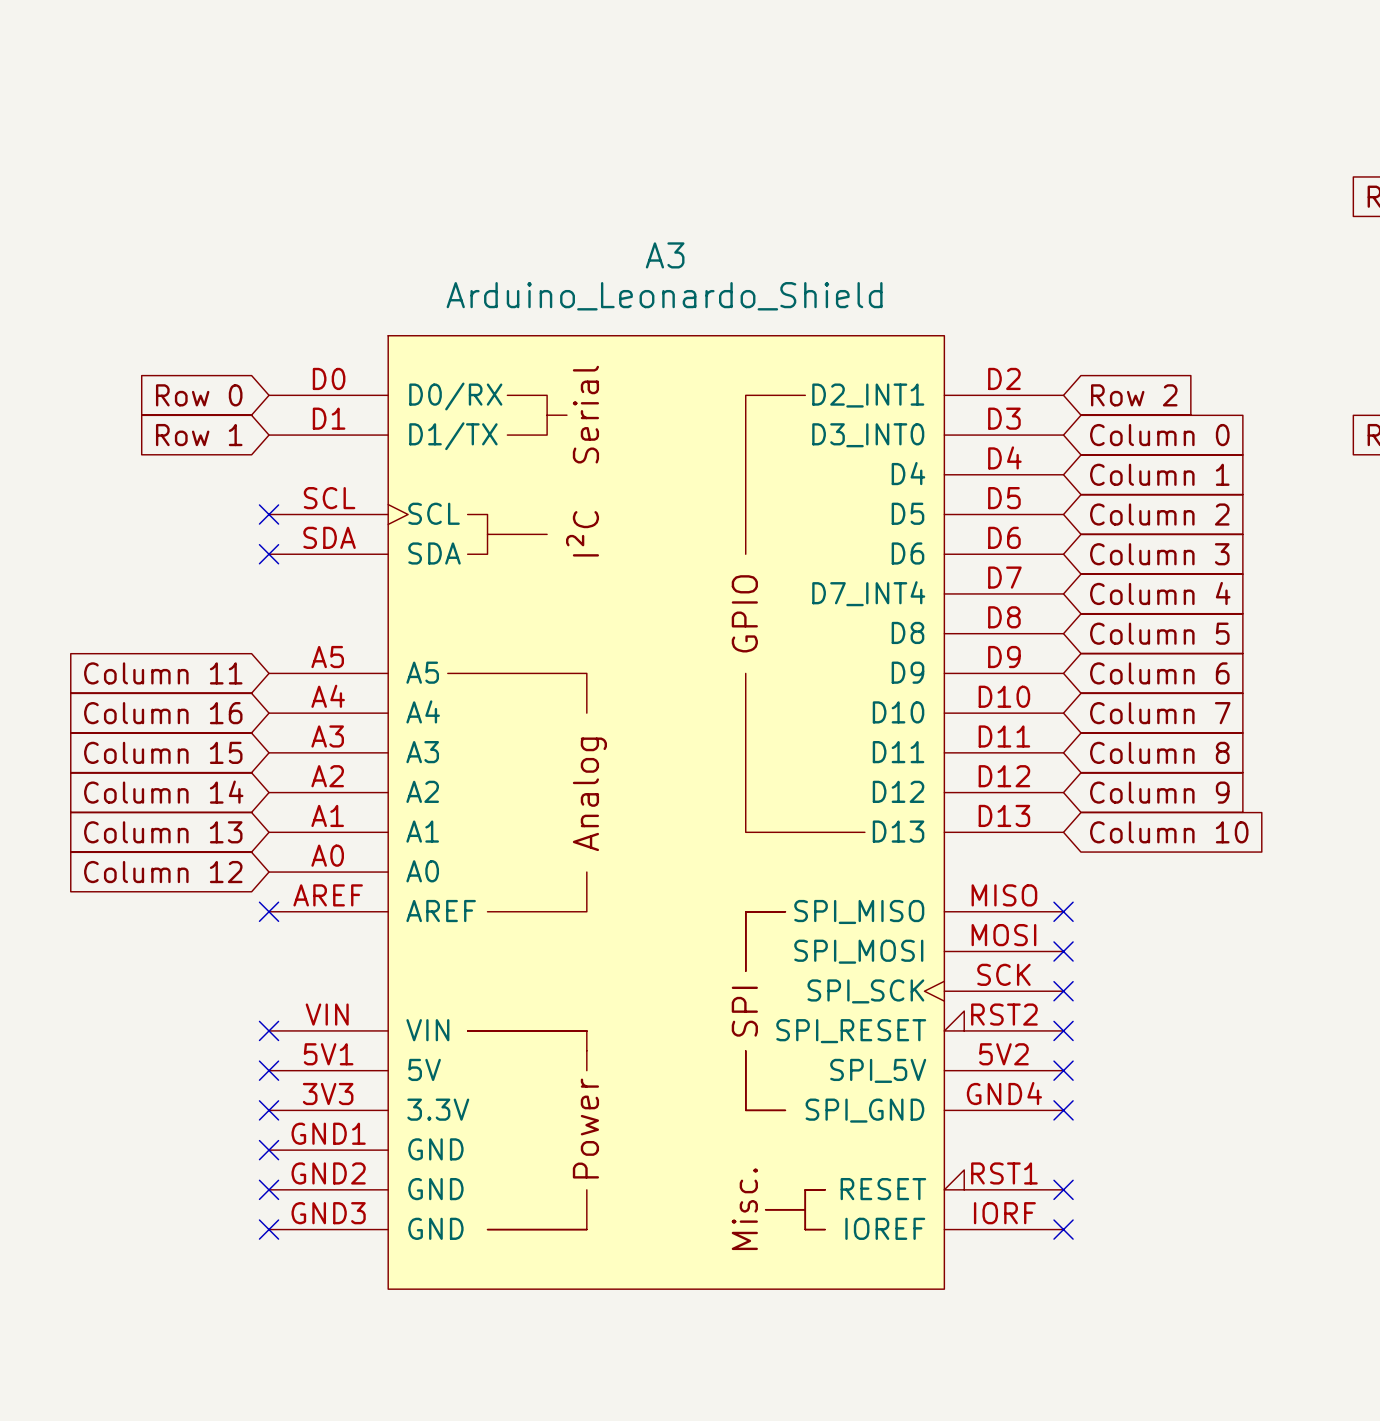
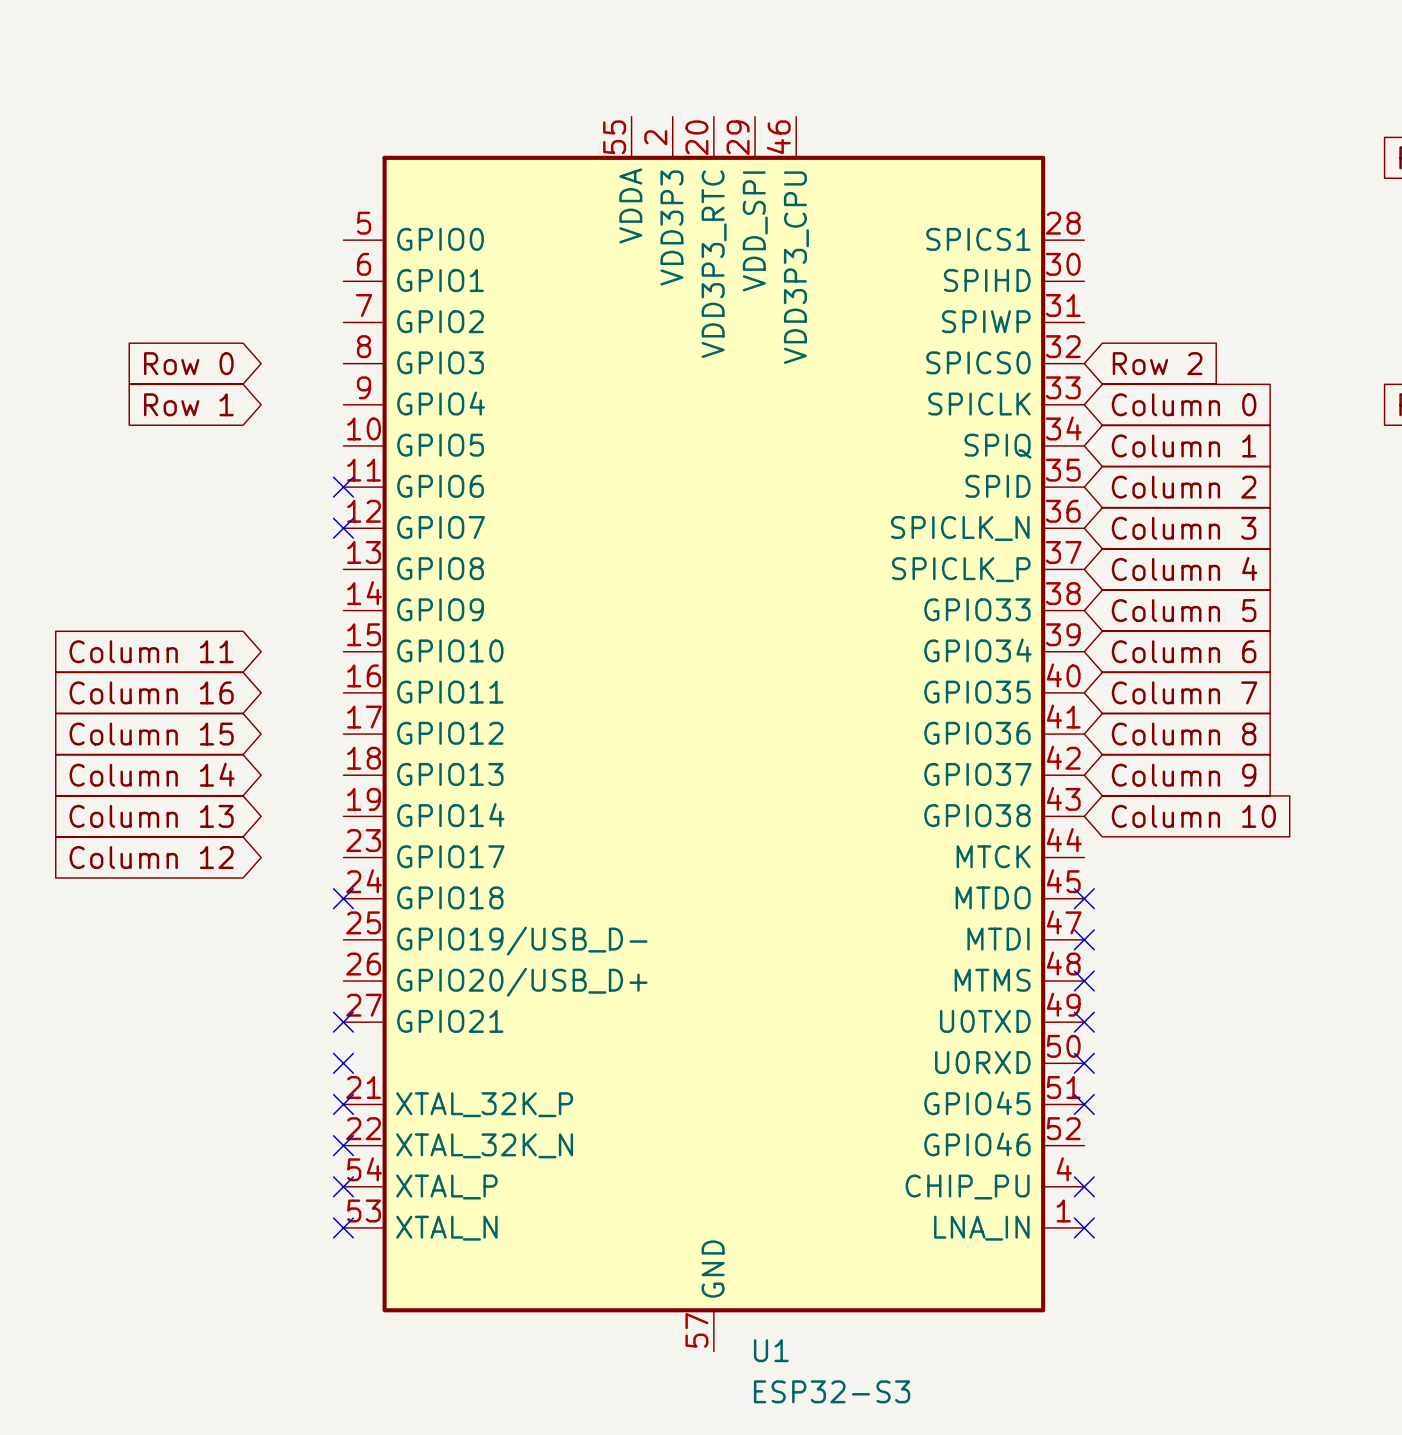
no-connect mark: (269, 514) -> none
no-connect mark: none -> (343, 487)
no-connect mark: (269, 554) -> none
no-connect mark: none -> (343, 528)
U1: none -> ESP32-S3 (713, 734)
A3: Arduino_Leonardo_Shield (666, 812) -> none
no-connect mark: (269, 911) -> none
no-connect mark: none -> (343, 898)
no-connect mark: (269, 1030) -> none
no-connect mark: none -> (343, 1022)
no-connect mark: (269, 1070) -> none
no-connect mark: none -> (343, 1063)
no-connect mark: (269, 1110) -> none
no-connect mark: none -> (343, 1104)
no-connect mark: (269, 1150) -> none
no-connect mark: none -> (343, 1145)
no-connect mark: (269, 1189) -> none
no-connect mark: none -> (343, 1186)
no-connect mark: (269, 1229) -> none
no-connect mark: none -> (343, 1227)

